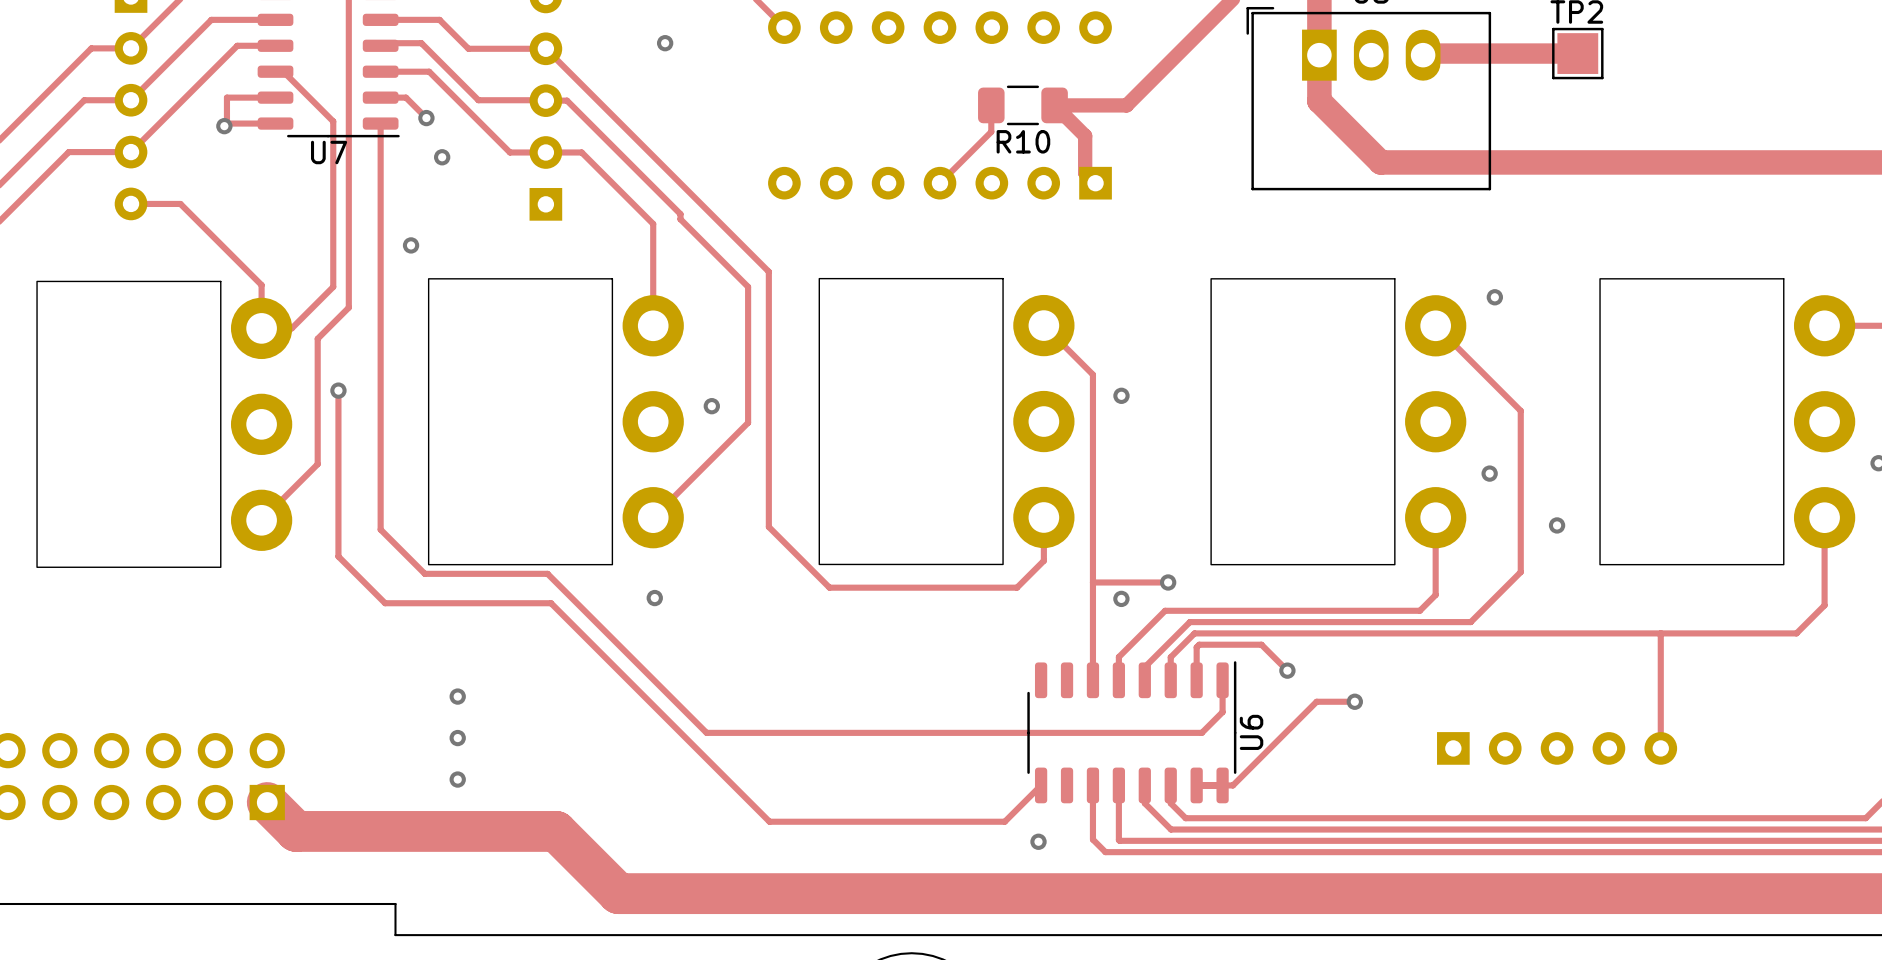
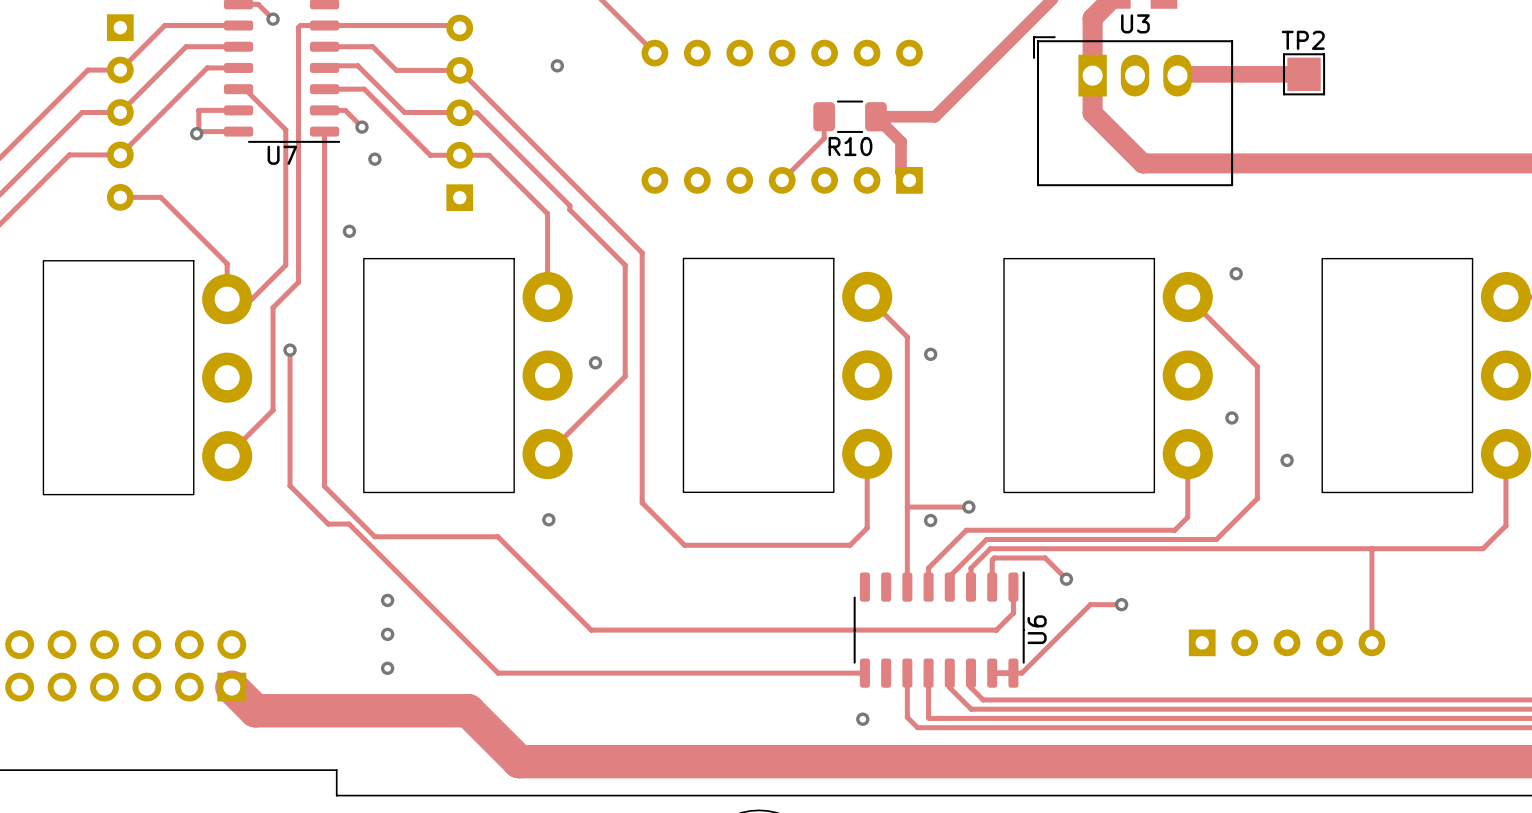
track: (768, 526) (829, 587) (1017, 587) (1043, 560) -> (642, 461) (642, 502) (684, 545) (850, 545) (867, 528) (867, 489)
track: (380, 529) (424, 573) (547, 573) (592, 618) -> (324, 463) (324, 486) (374, 536) (497, 536)
track: (410, 603) (551, 603) (769, 821) (1004, 821) (1041, 785) -> (349, 524) (498, 673) (864, 673)

